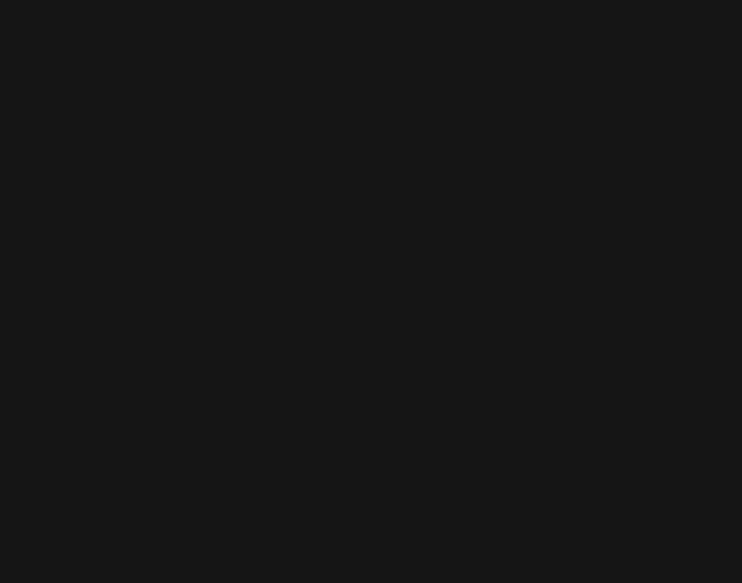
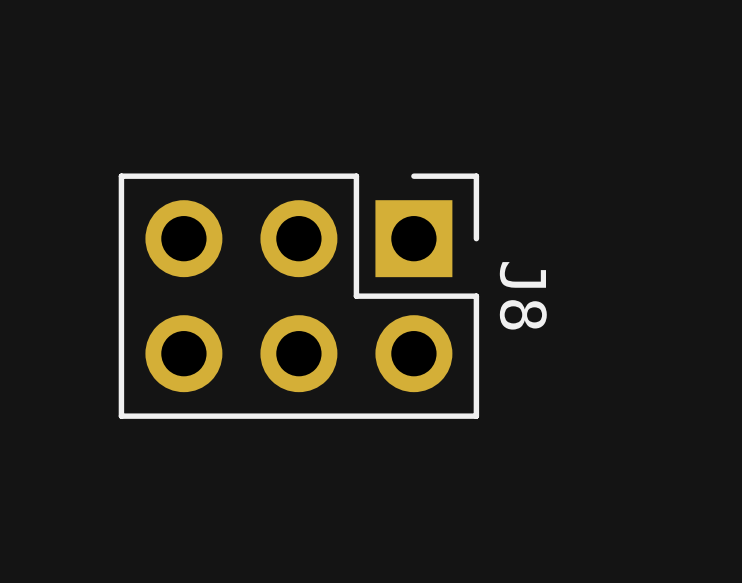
J8: none -> (298, 296)

